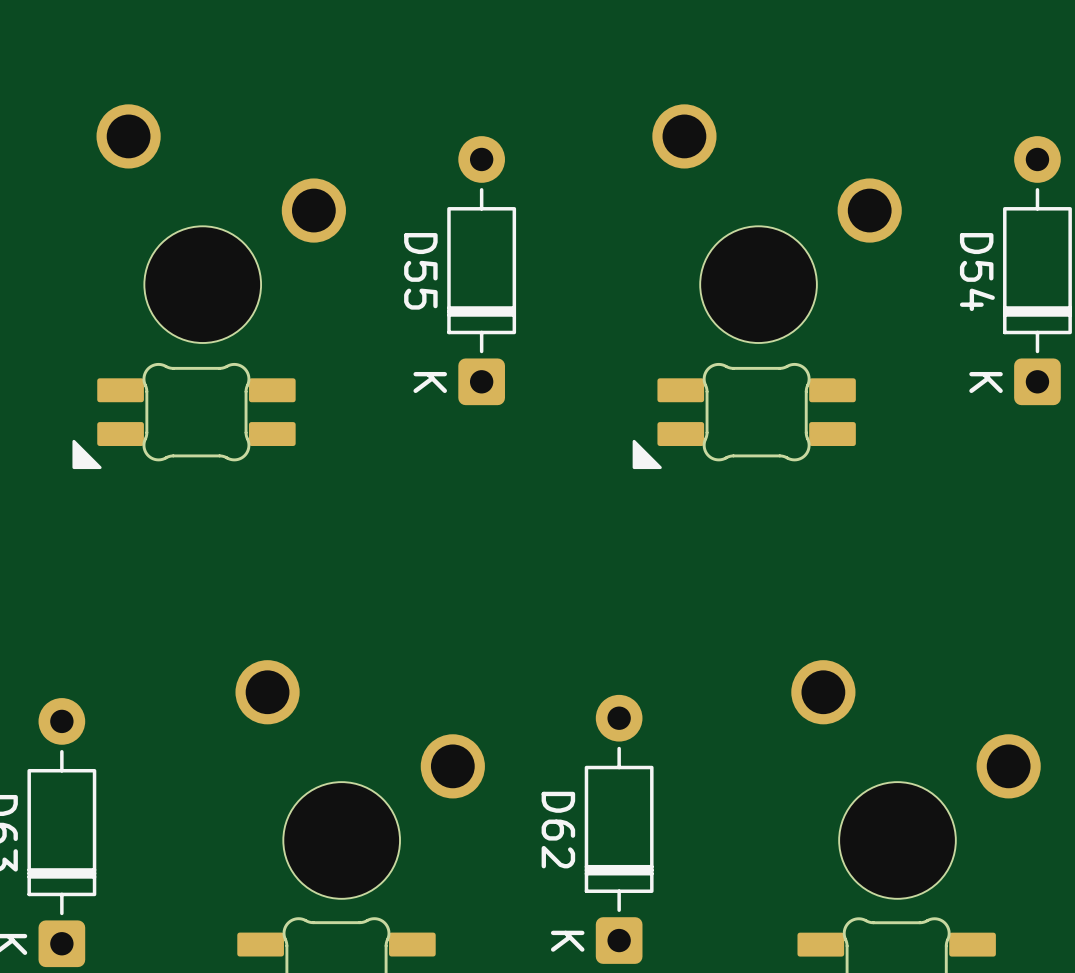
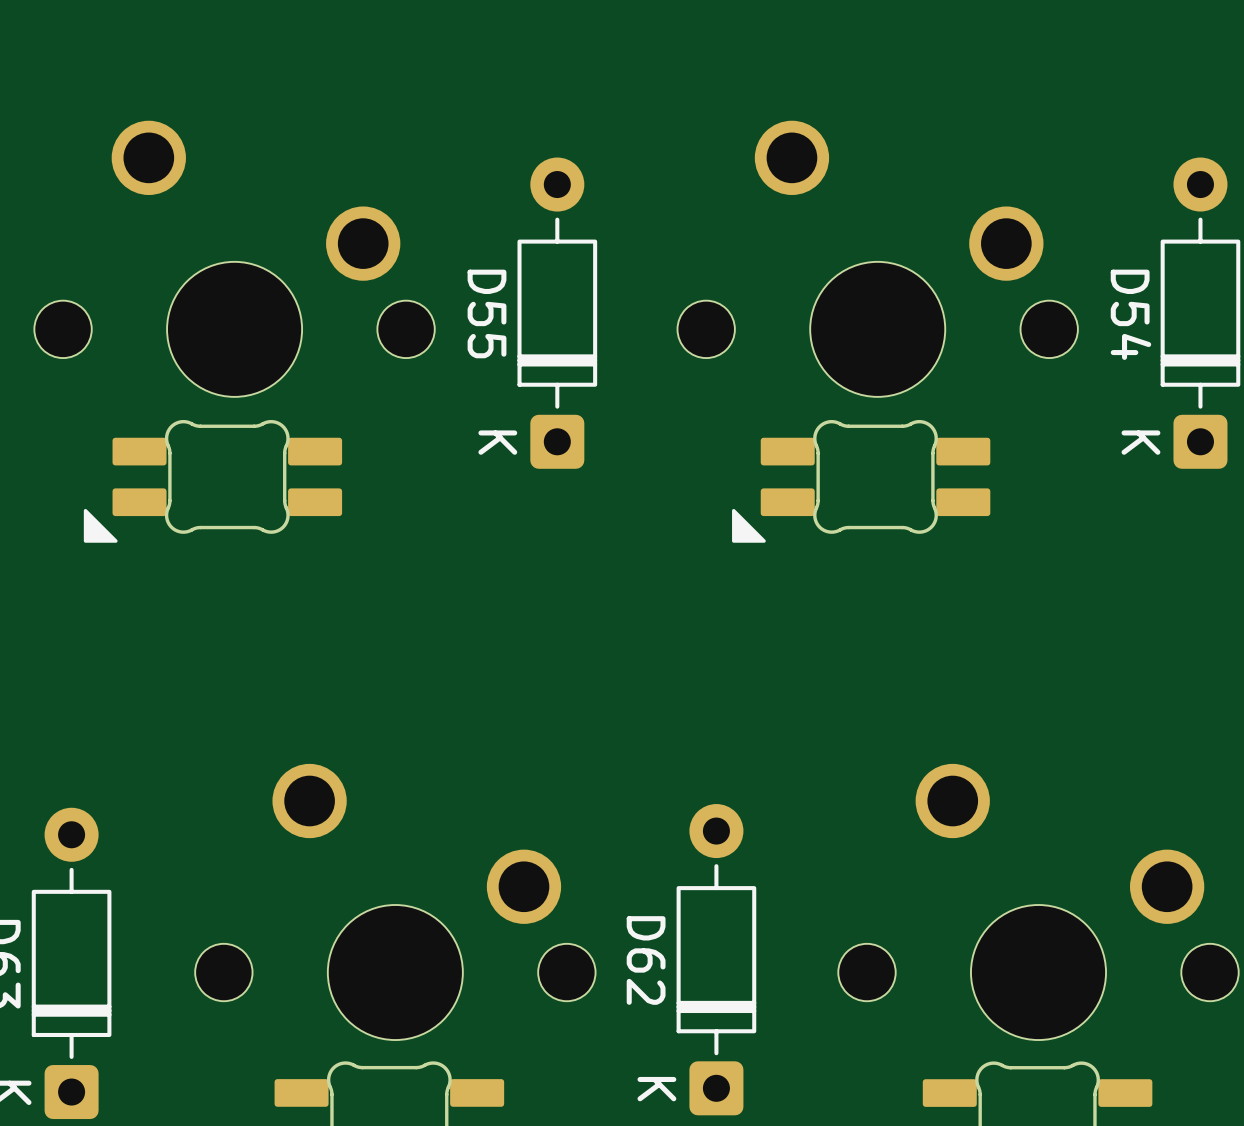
part footprint: [96, 104, 346, 344] -> [34, 120, 435, 397]
part footprint: [652, 104, 902, 344] -> [677, 120, 1078, 397]
part footprint: [235, 660, 485, 899] -> [195, 763, 596, 1041]
part footprint: [791, 660, 1041, 899] -> [838, 763, 1239, 1041]

